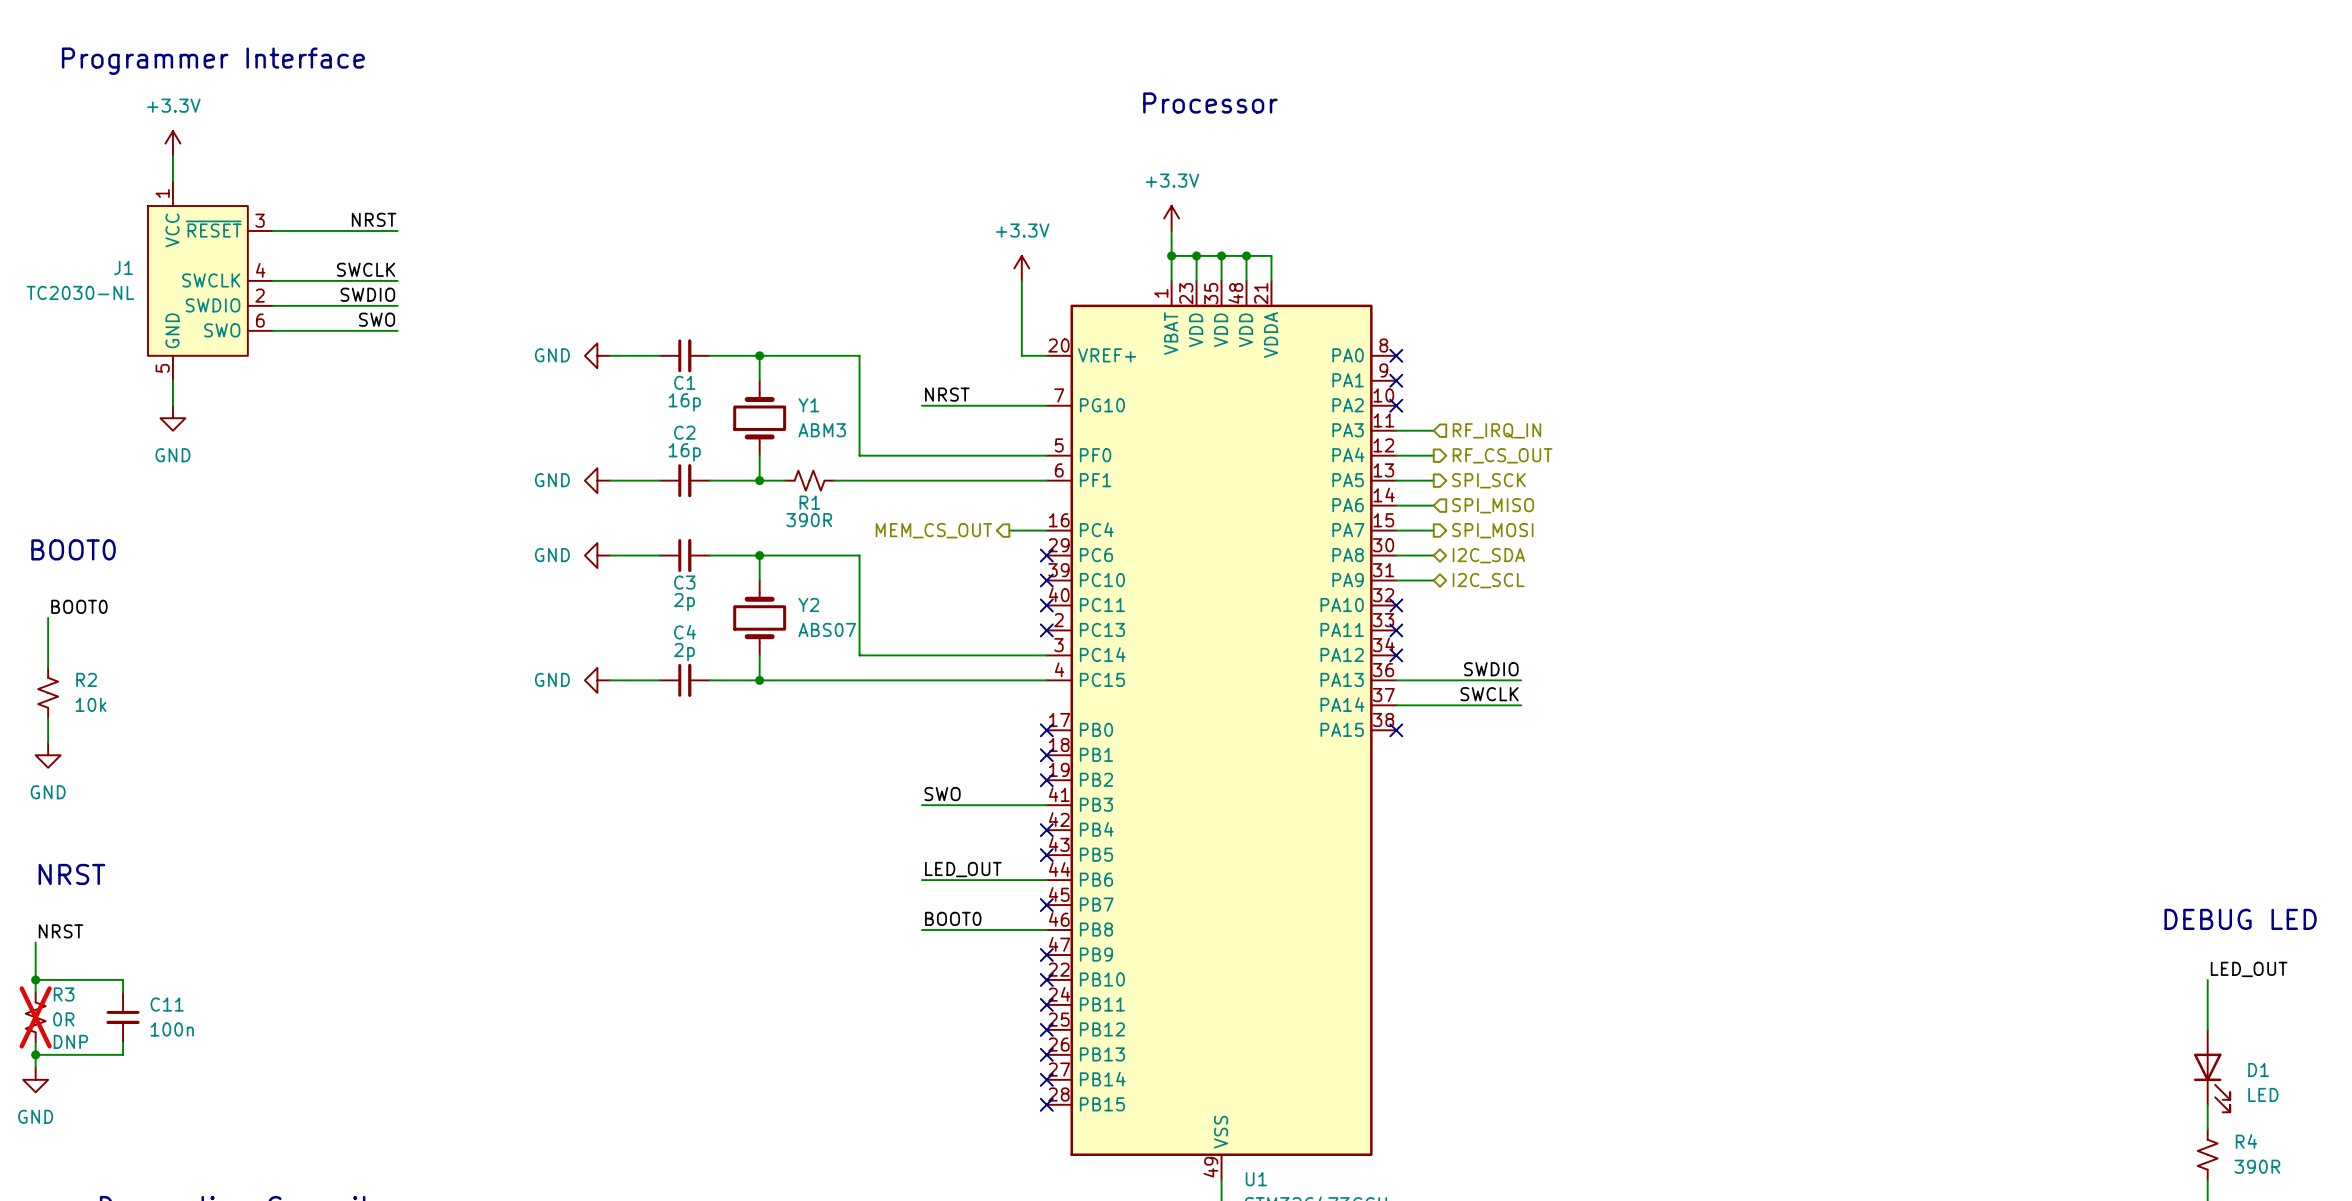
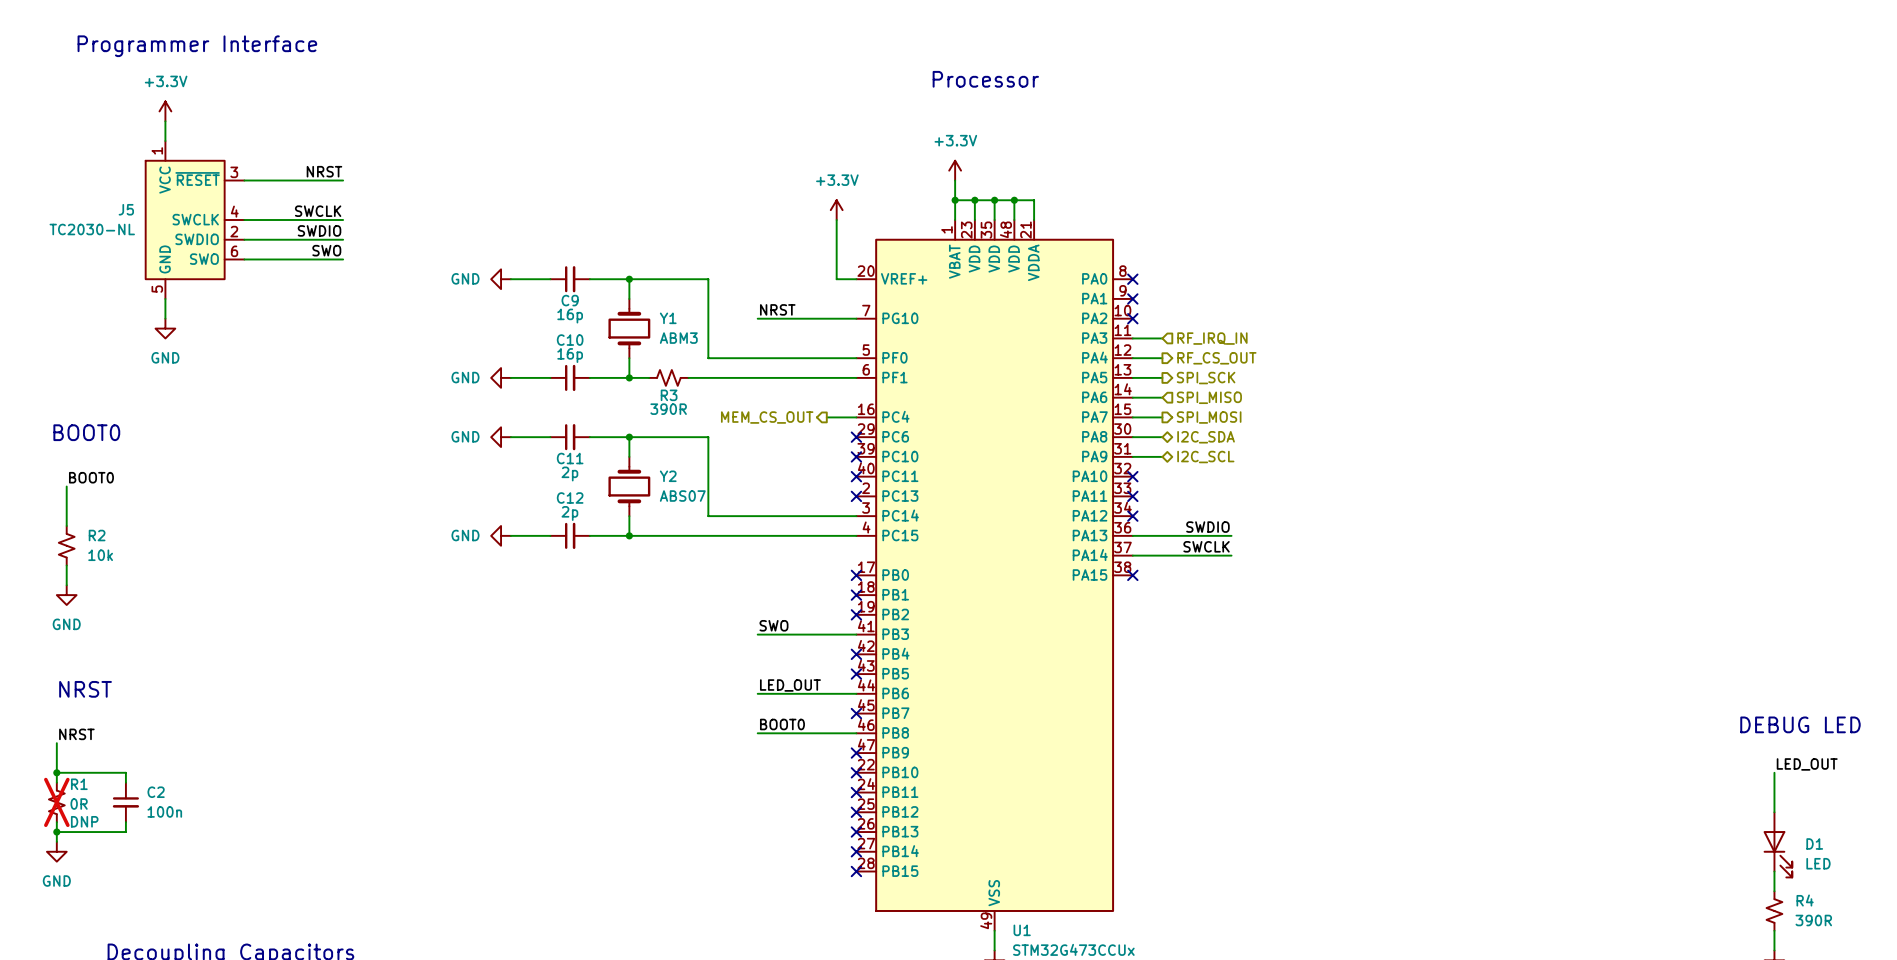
J1 name: J1 (123, 267) -> J5 (126, 209)
C1 name: C1 (684, 382) -> C9 (570, 300)
C2 name: C2 (684, 432) -> C10 (570, 340)
R1 name: R1 (809, 502) -> R3 (669, 395)
C3 name: C3 (684, 582) -> C11 (570, 458)
C4 name: C4 (685, 632) -> C12 (570, 498)
R3 name: R3 (64, 994) -> R1 (79, 784)
C11 name: C11 (167, 1004) -> C2 (156, 792)

